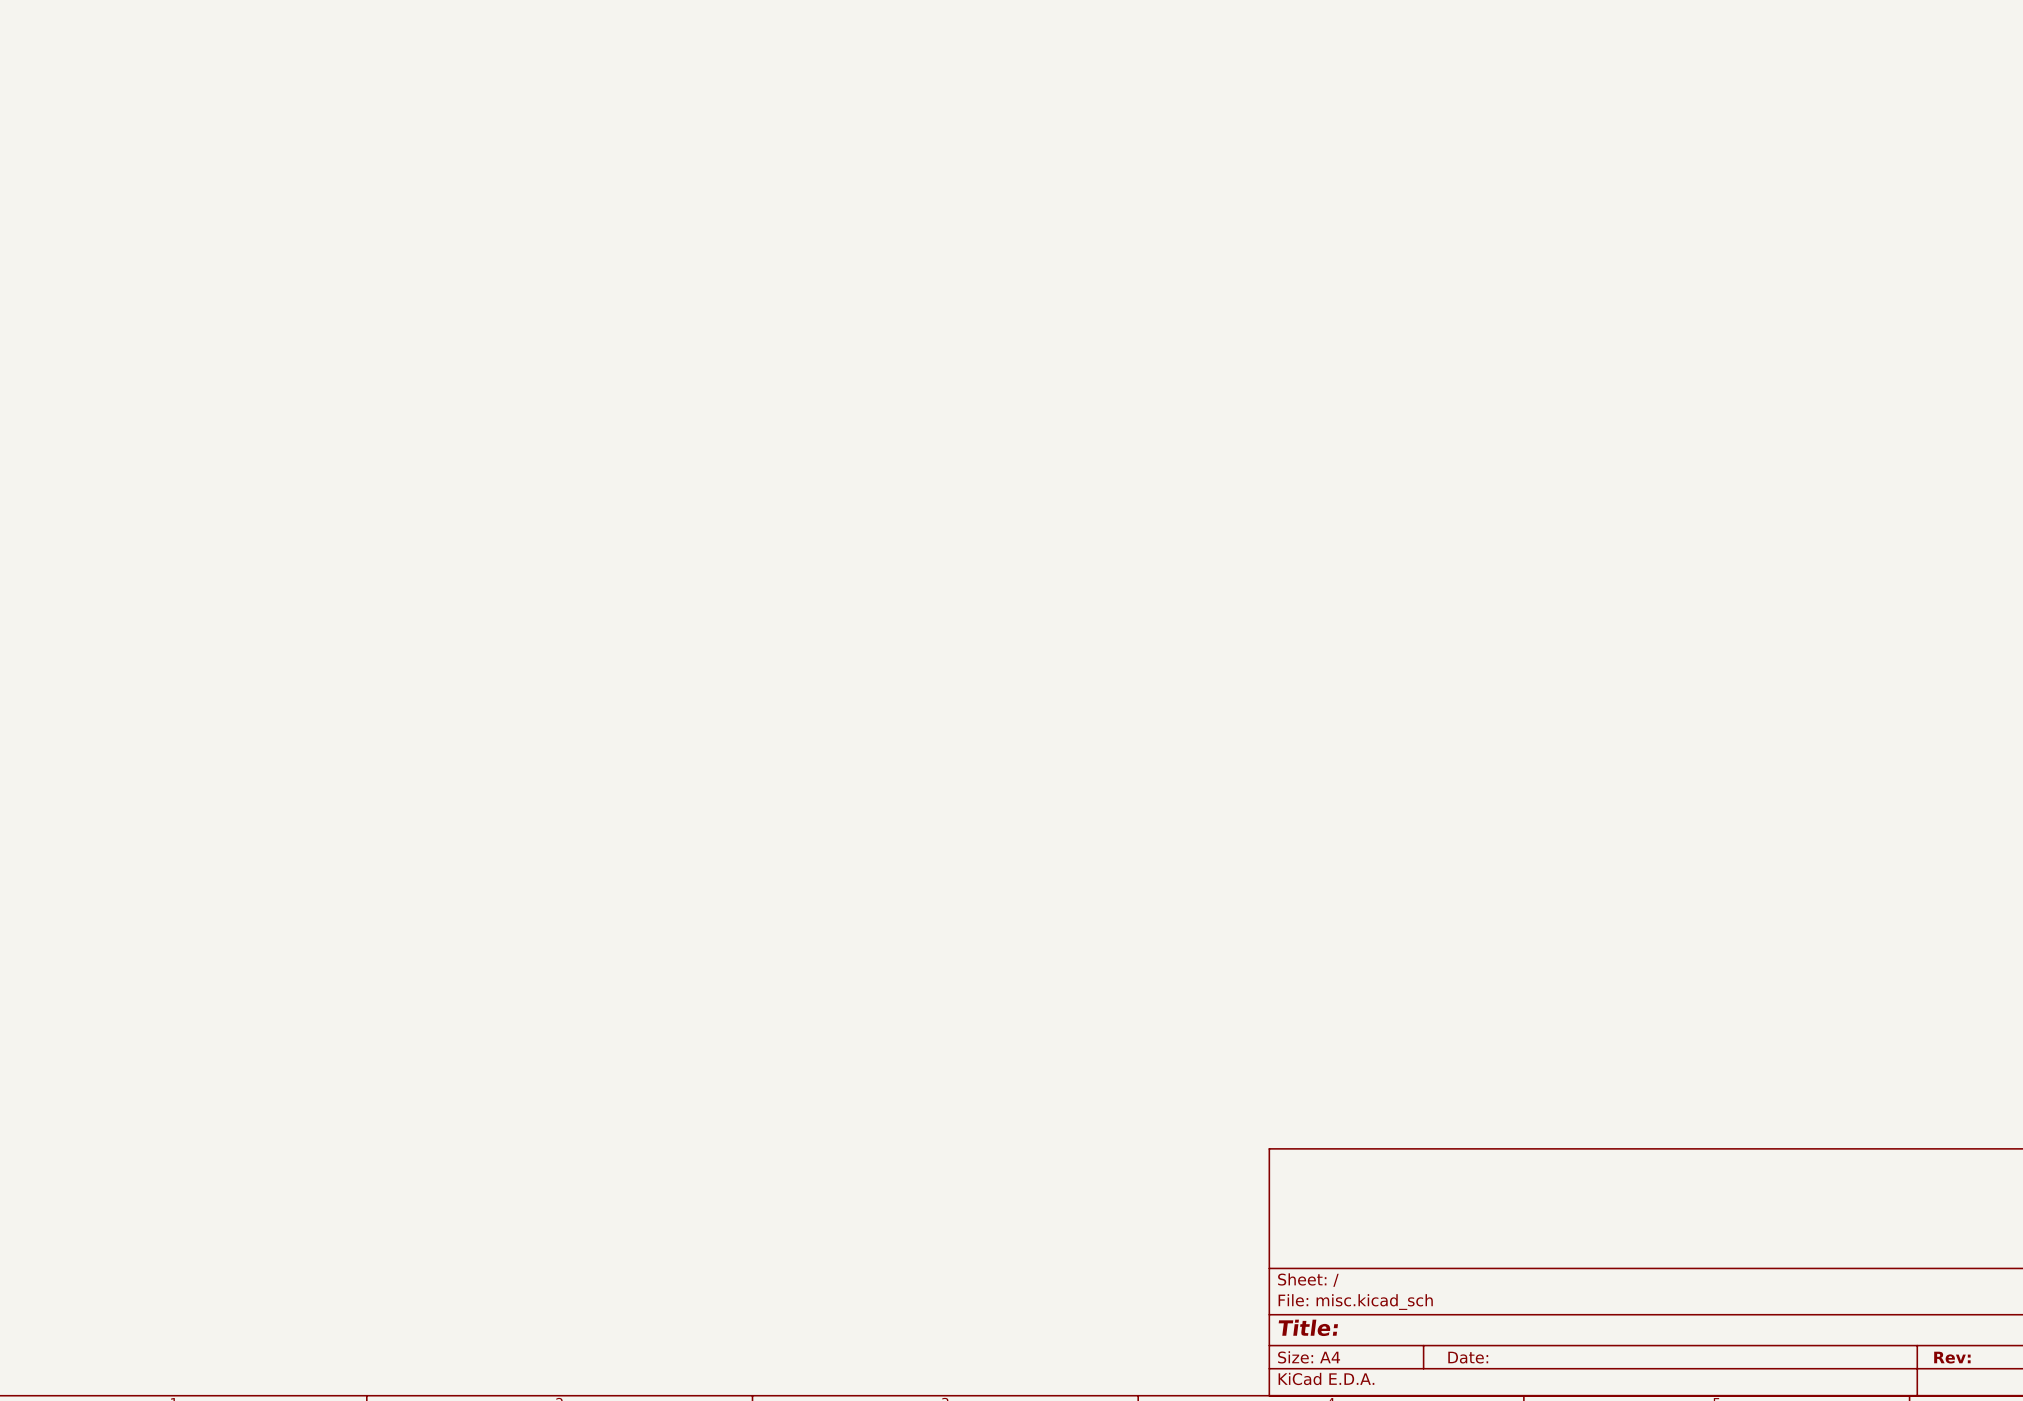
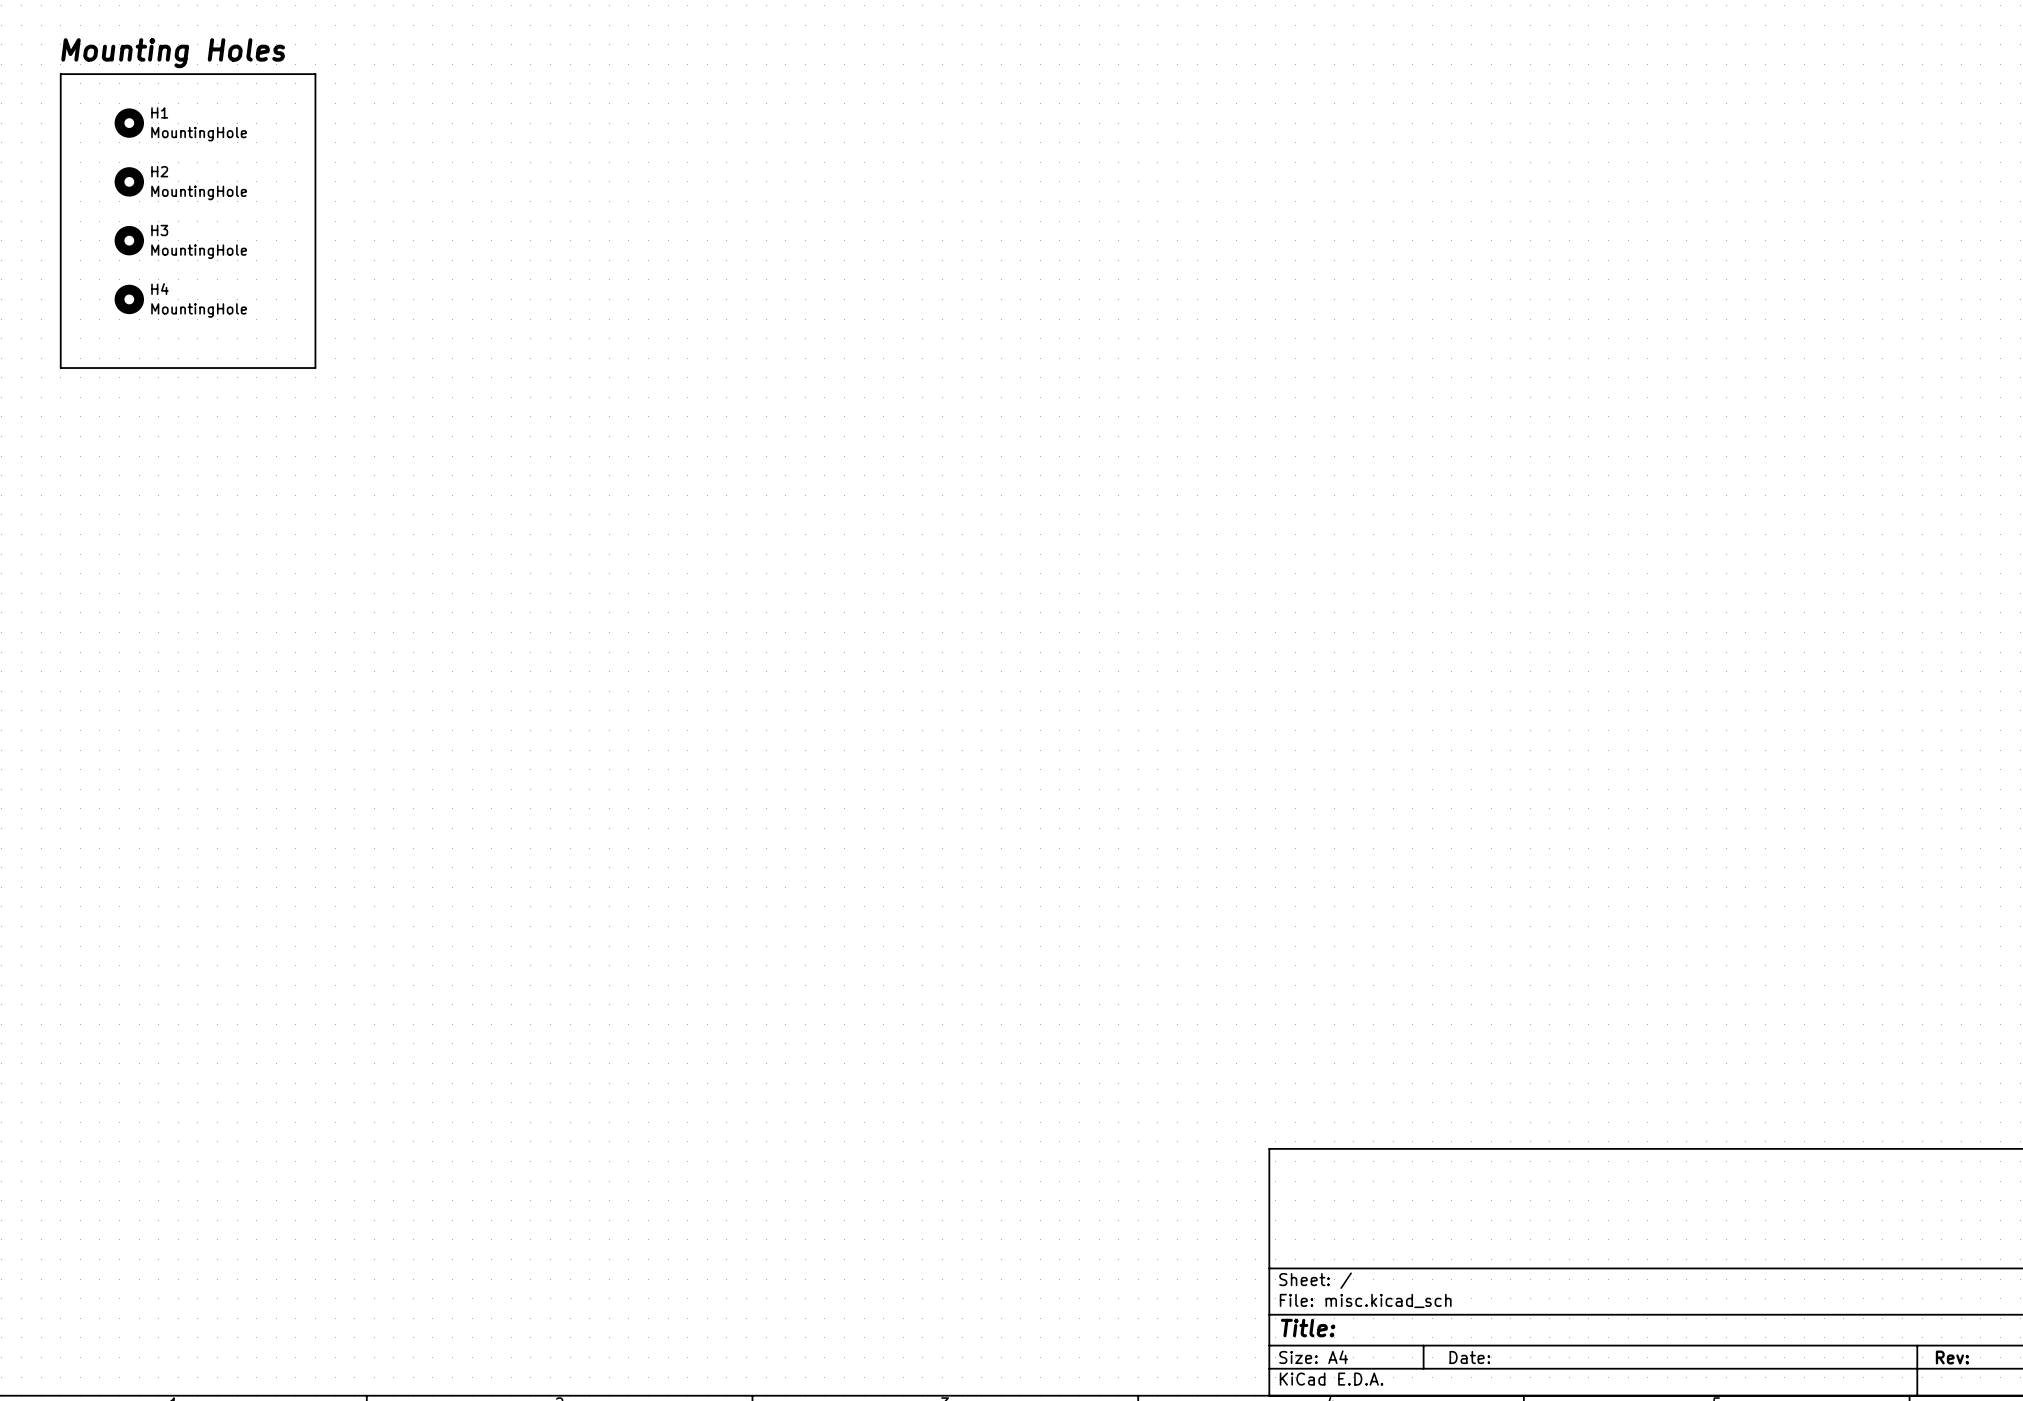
text: none -> Mounting Holes (173, 53)
line: none -> (60, 74) (315, 74) (315, 368) (60, 368) (60, 74)
H1: none -> MountingHole (129, 123)
H2: none -> MountingHole (129, 181)
H3: none -> MountingHole (129, 240)
H4: none -> MountingHole (129, 299)

